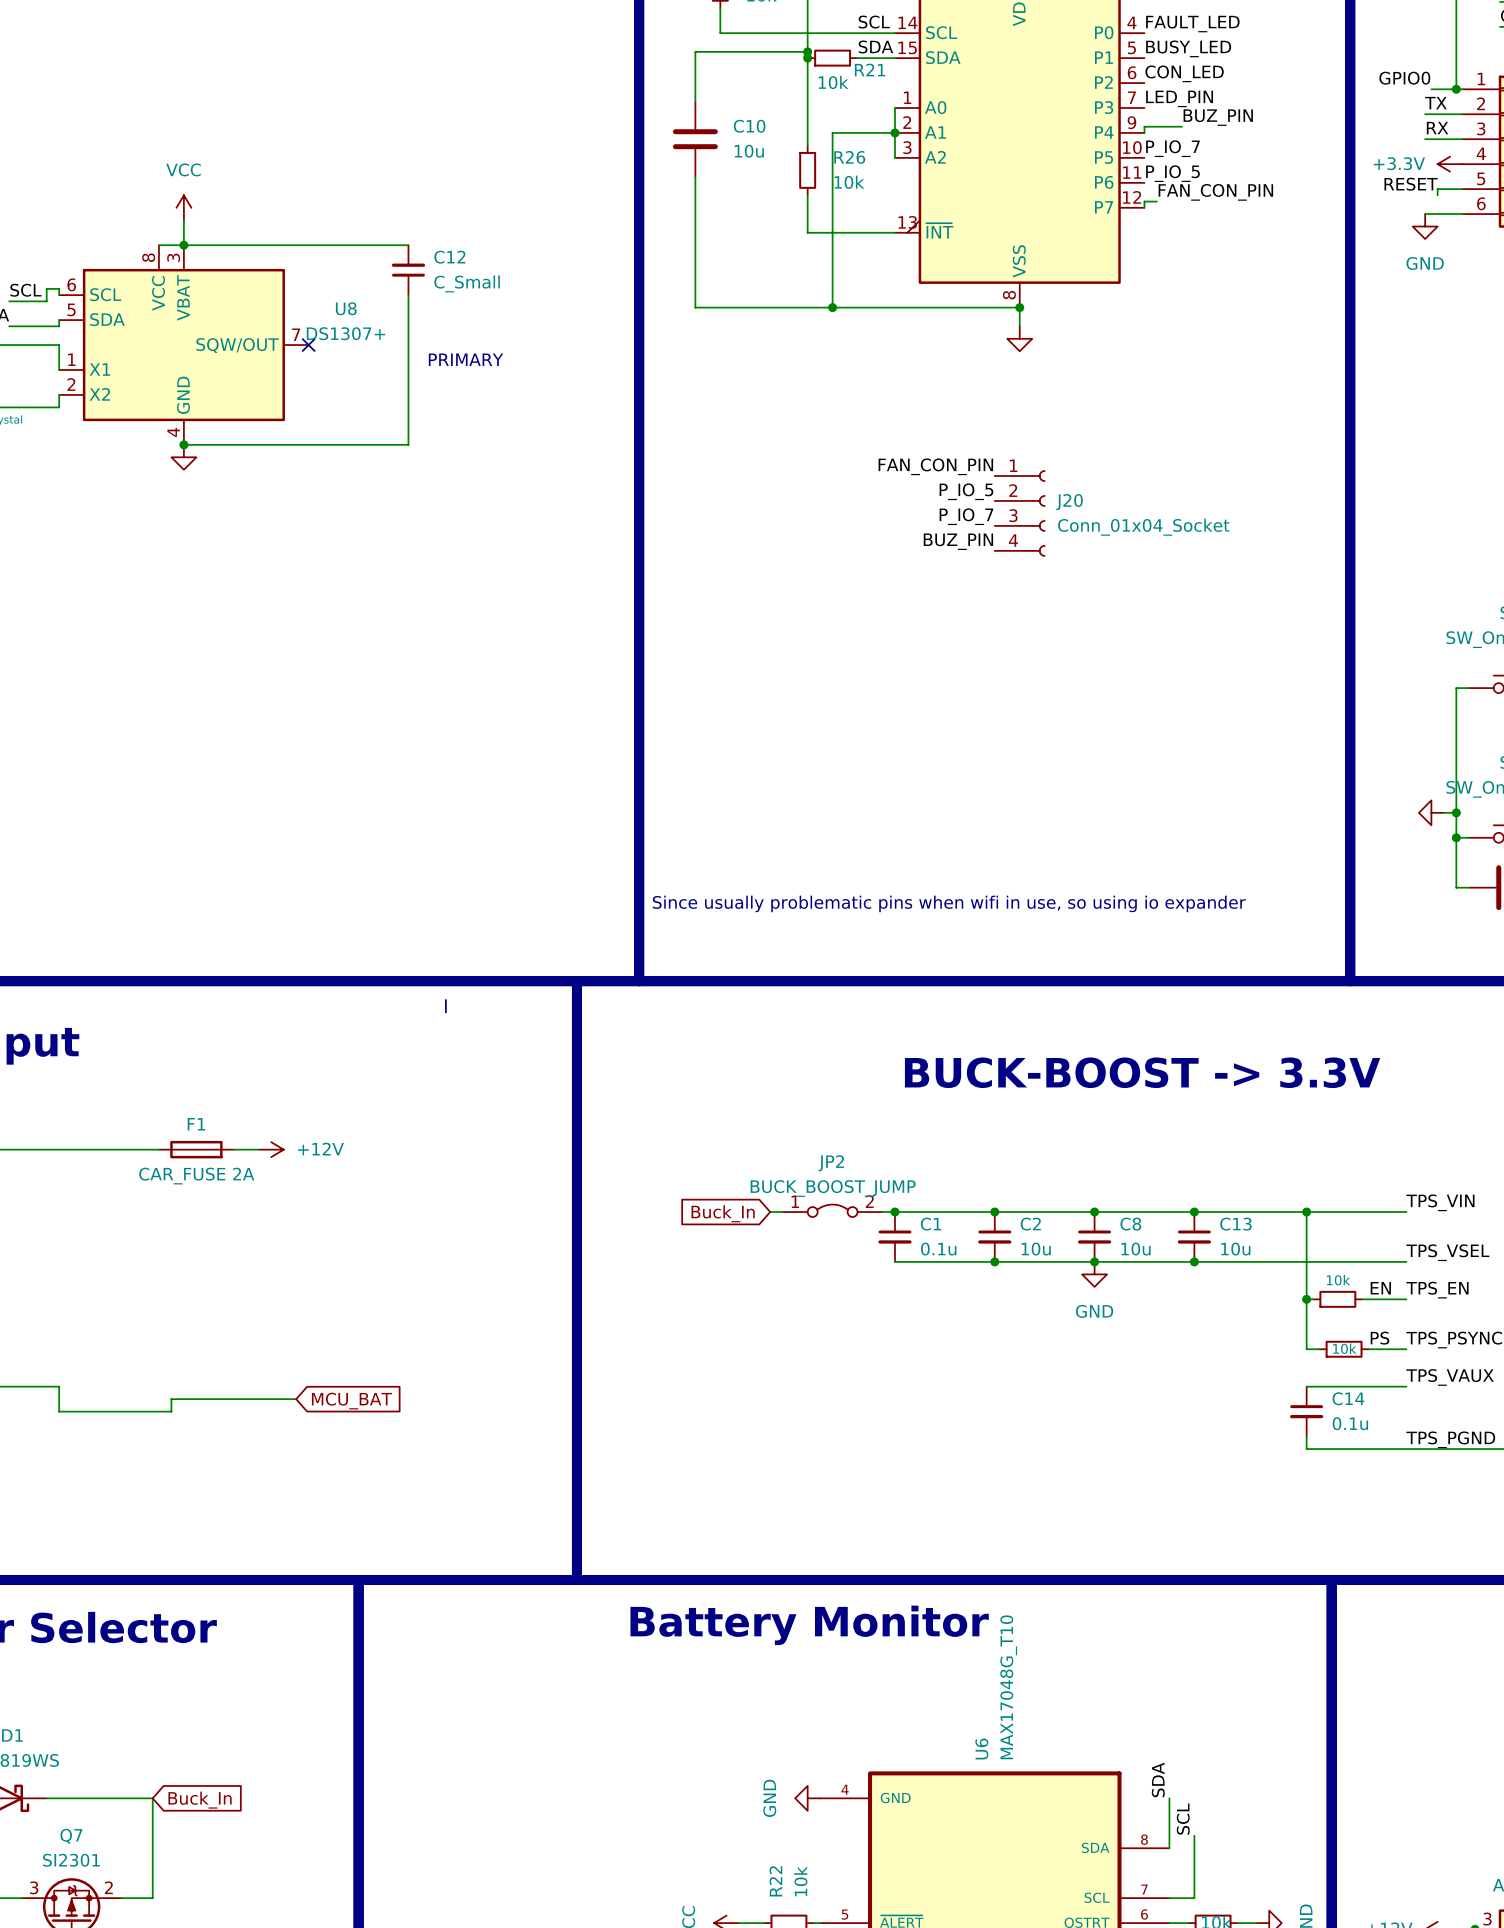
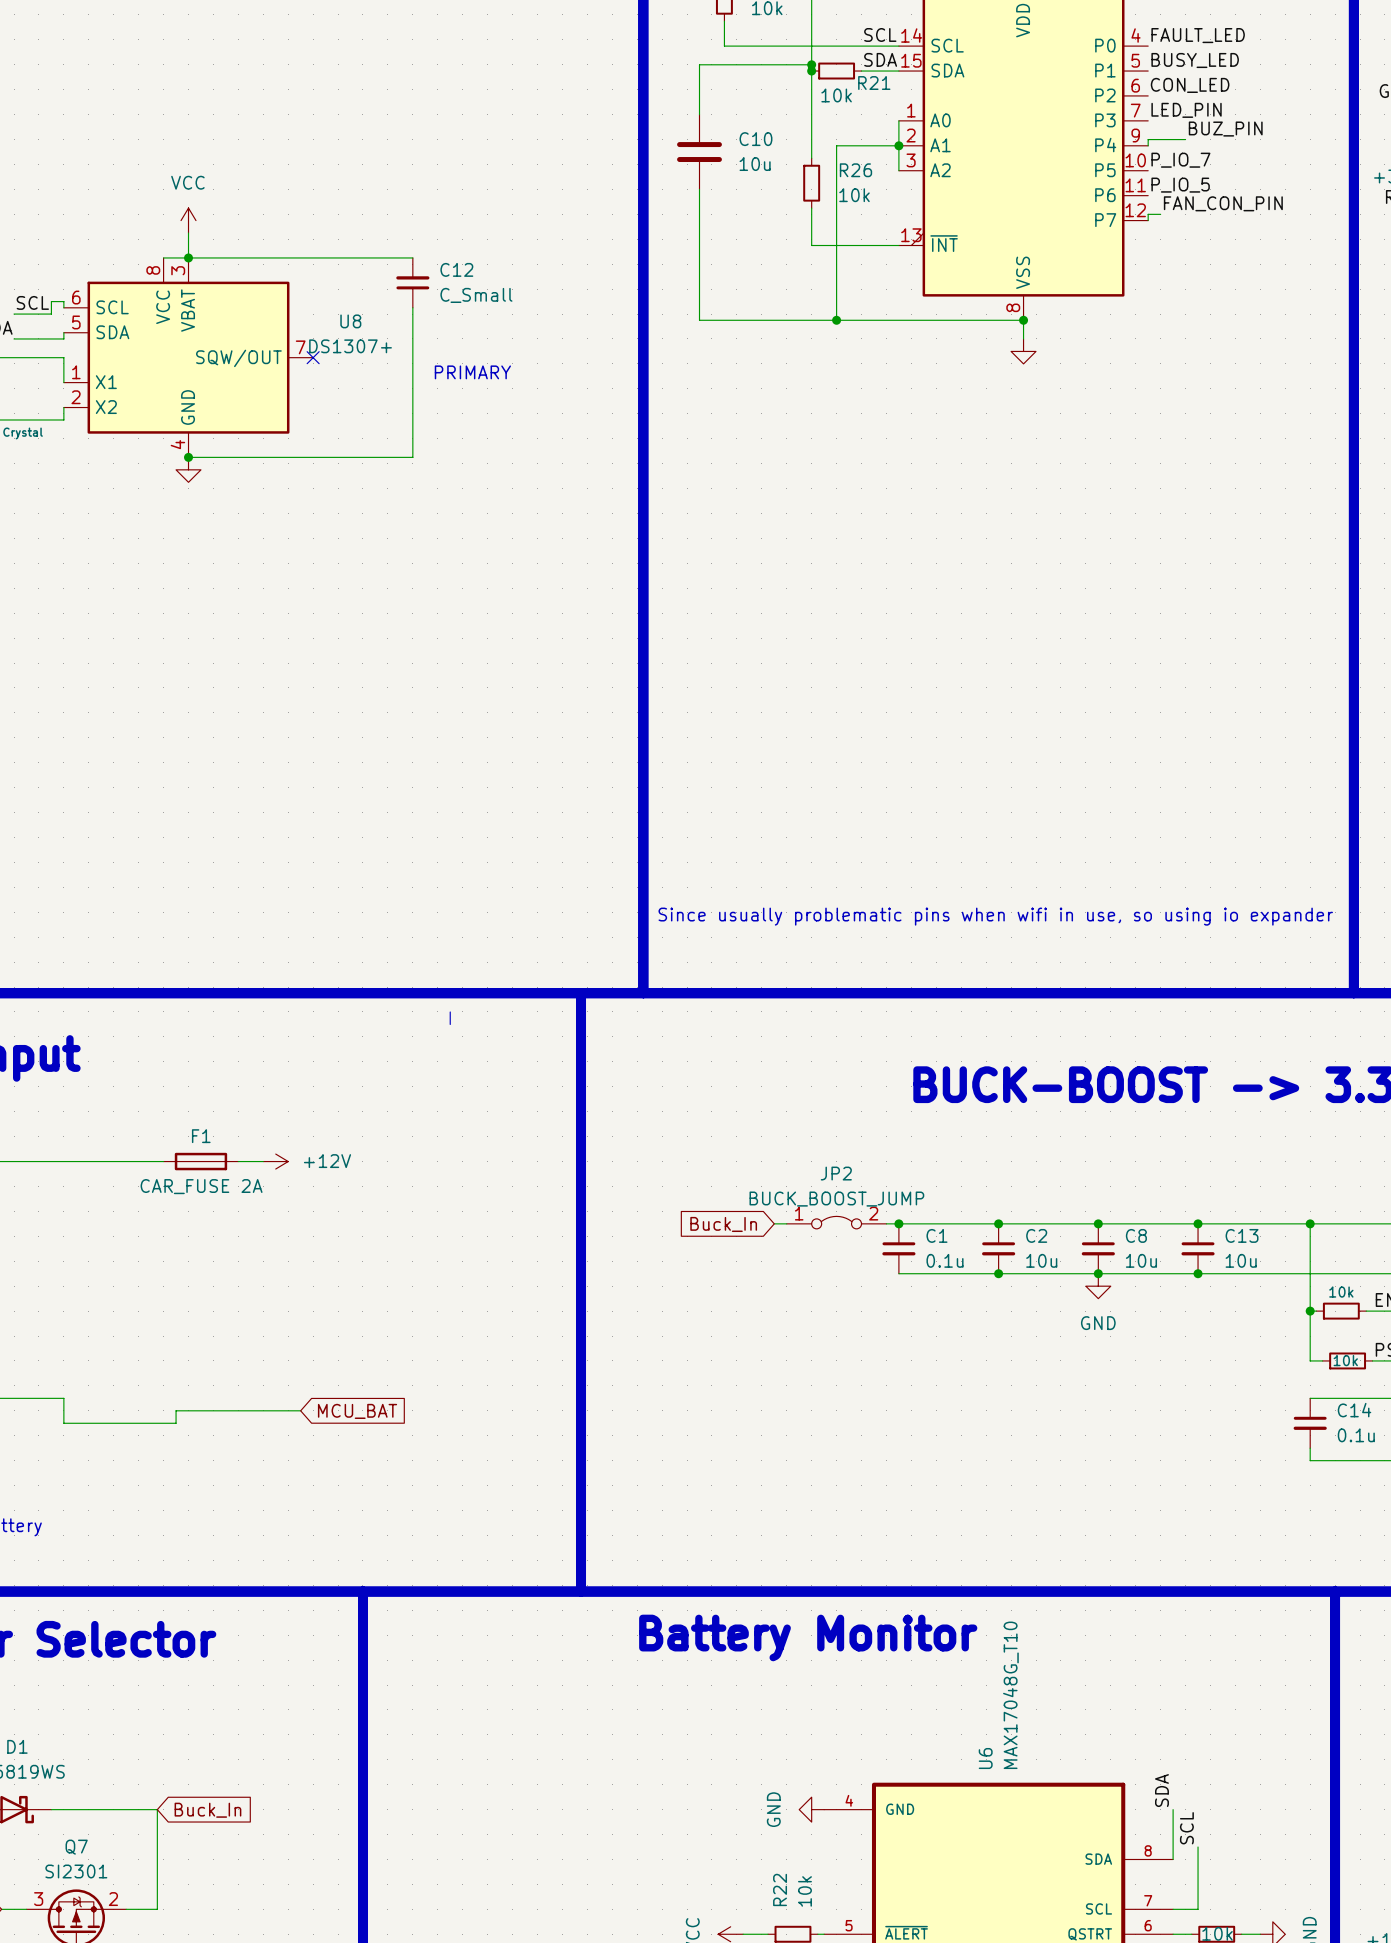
label: FAN_CON_PIN (935, 466) -> none
label: P_IO_5 (966, 491) -> none
J20: Conn_01x04_Socket (1020, 513) -> none
label: P_IO_7 (966, 516) -> none
label: BUZ_PIN (958, 541) -> none

